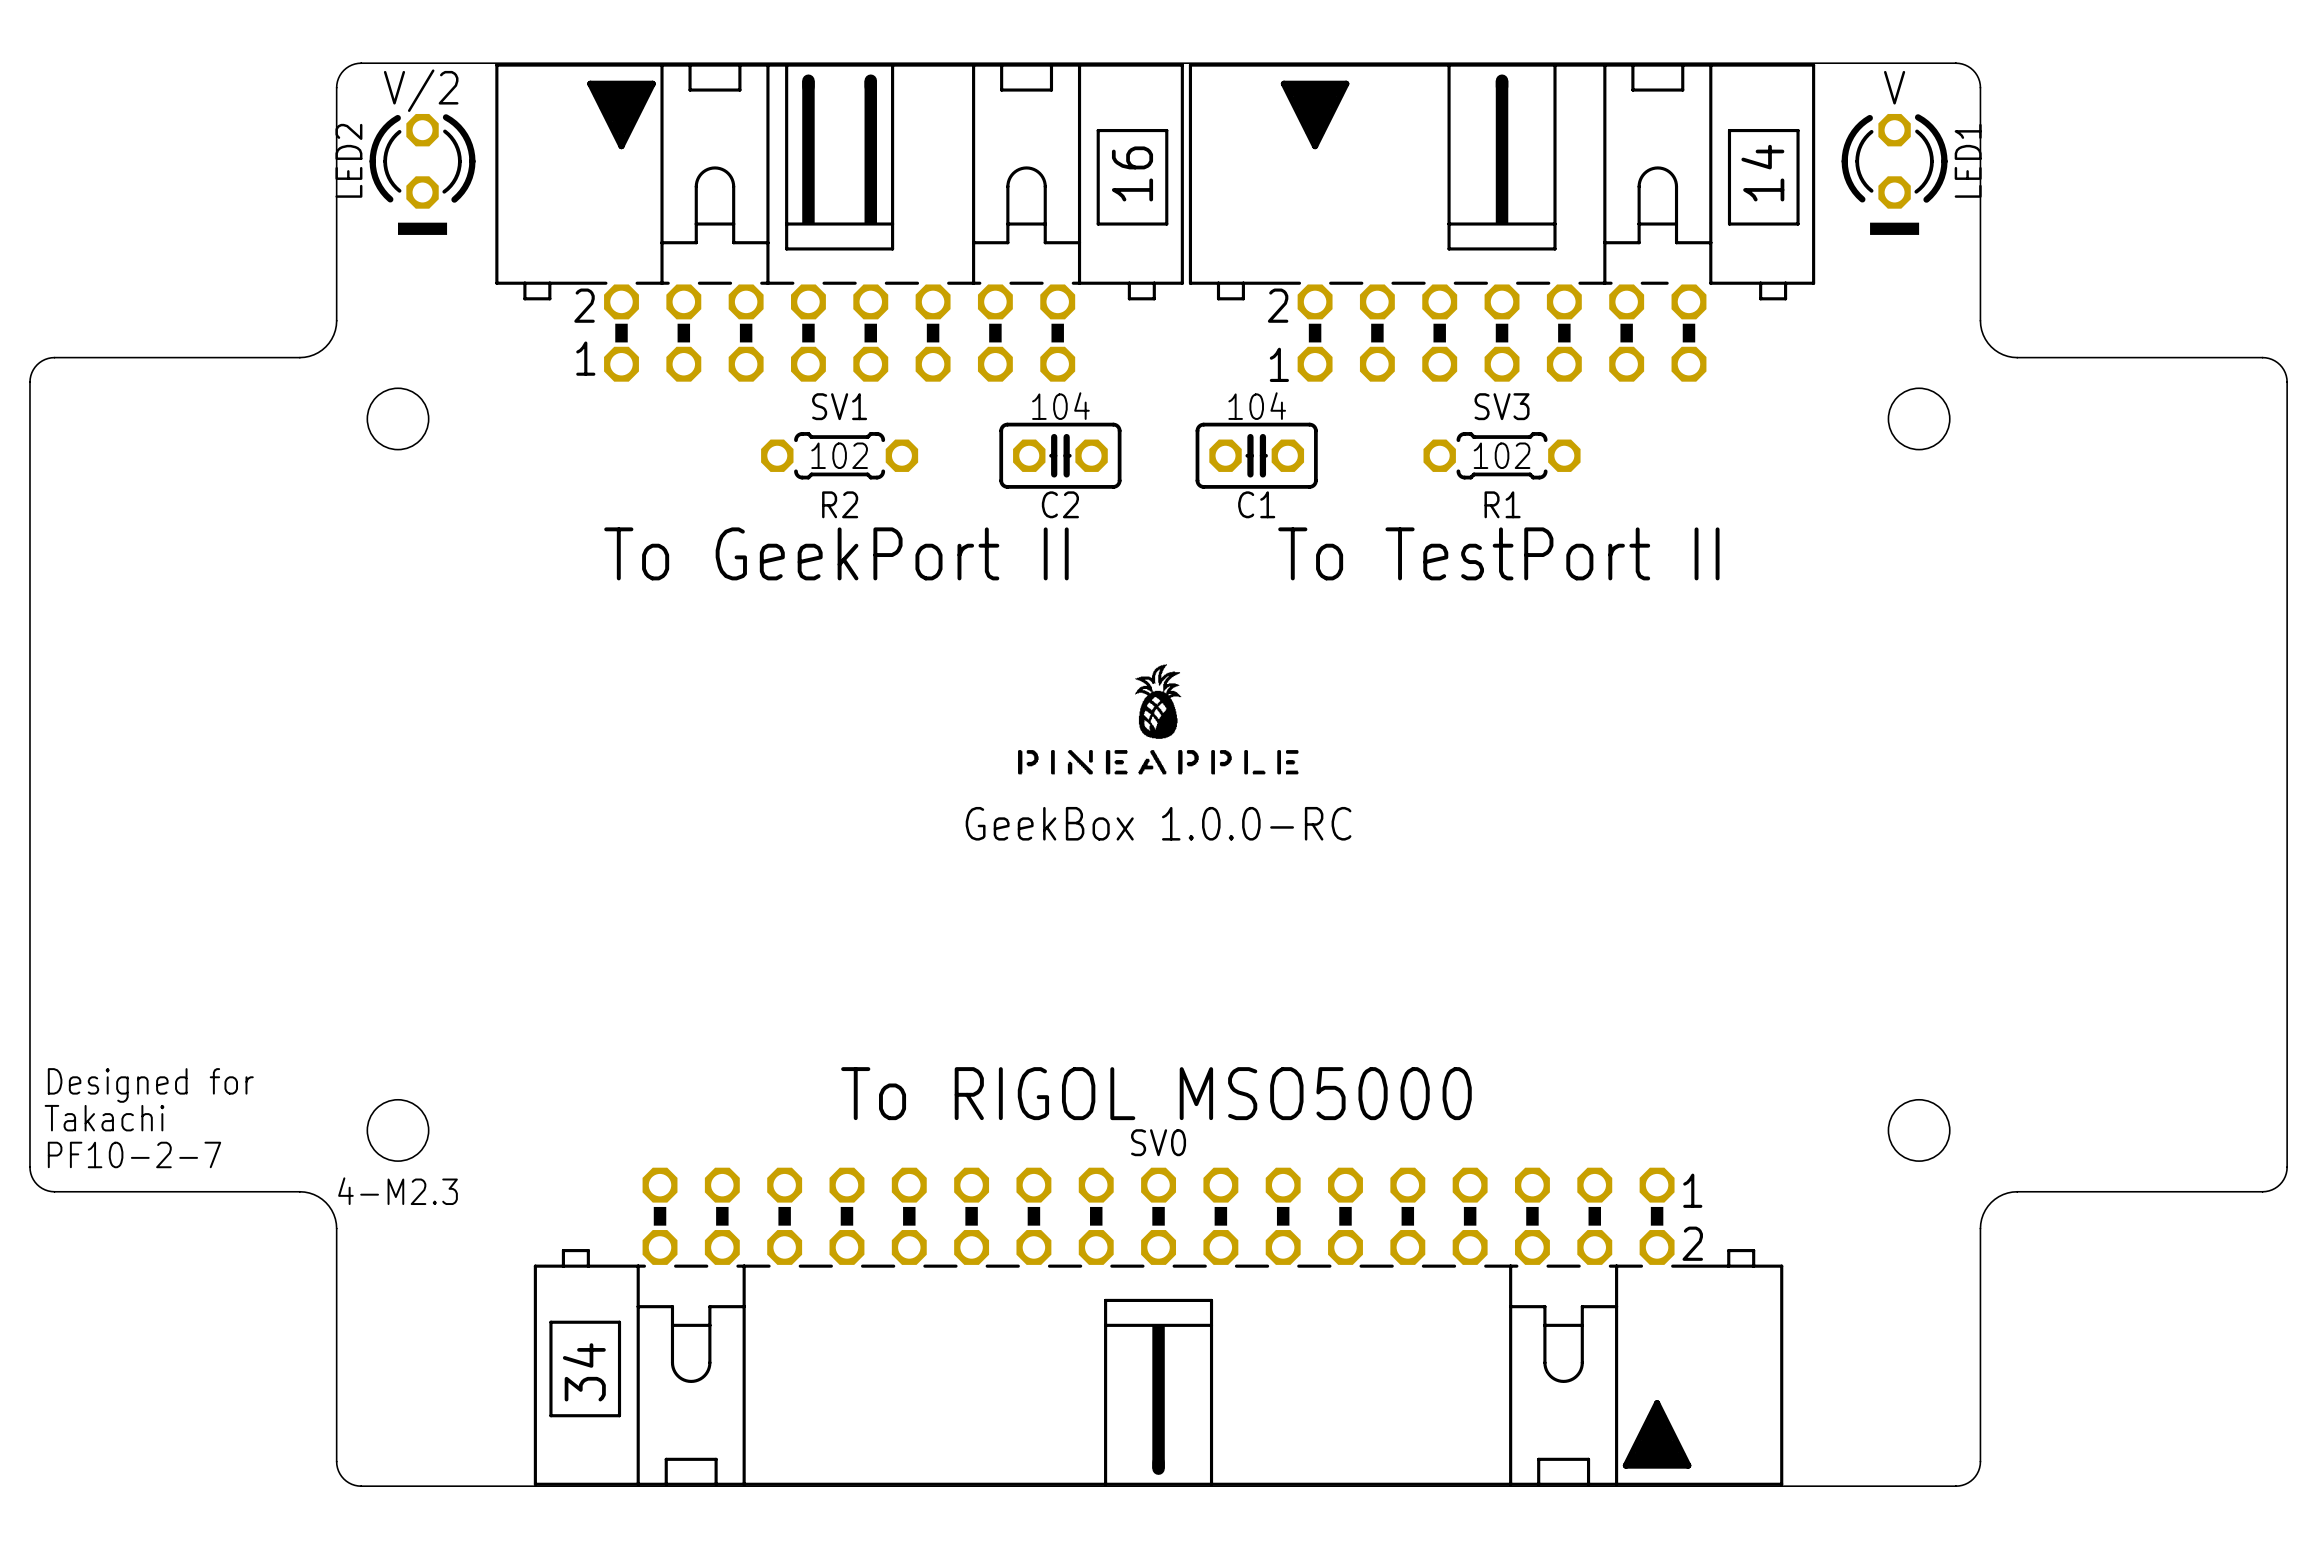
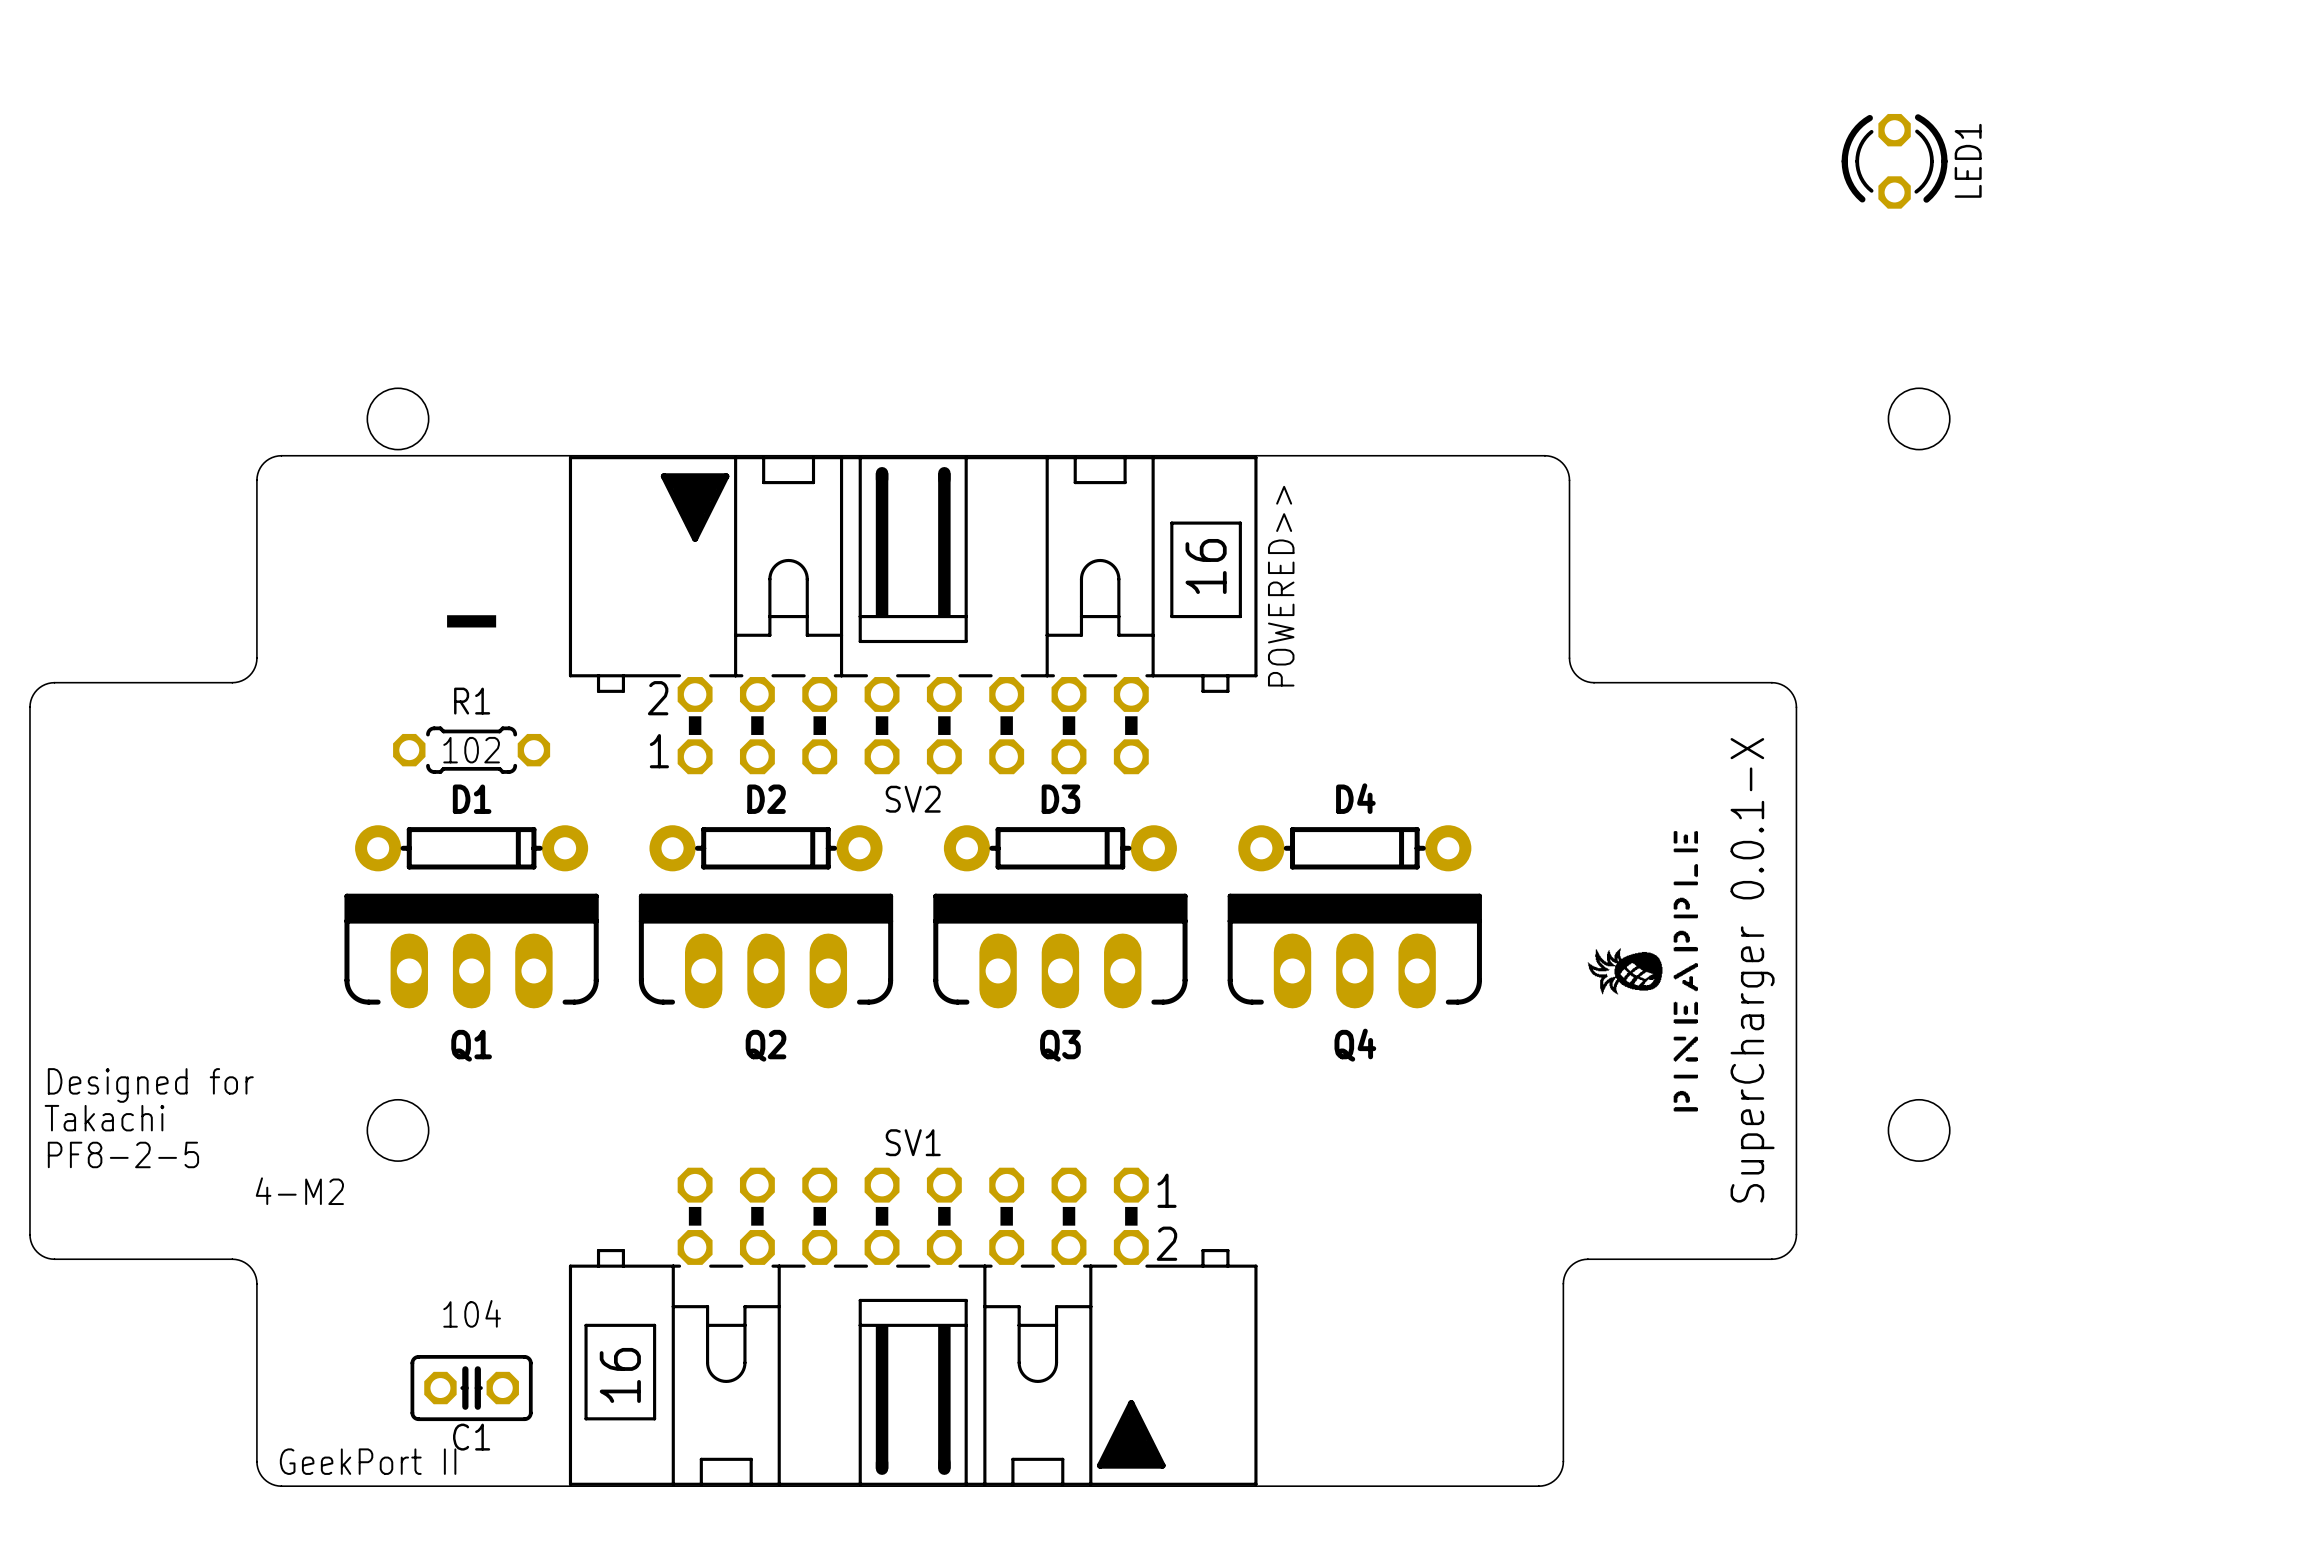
SV1 footprint: [495, 63, 1184, 382] -> [568, 1167, 1258, 1486]
text: V (1894, 87) -> none
text: V/2 (421, 90) -> none
LED2: (422, 161) -> none
SV3: (1502, 222) -> none
drawing: [1870, 222, 1920, 235] -> none
drawing position: (422, 228) -> (471, 621)
SV1 name position: SV1 (839, 406) -> SV1 (913, 1142)
text: 104 (1060, 406) -> none
text: 104 (1257, 406) -> none
text position: 102 (839, 455) -> 102 (471, 750)
R2: (839, 455) -> none
C2: (1060, 455) -> none
C1 position: (1256, 455) -> (471, 1388)
text: 102 (1502, 455) -> none
R1 position: (1502, 455) -> (471, 750)
R1 name position: R1 (1502, 504) -> R1 (472, 701)
text: To GeekPort II (836, 553) -> none
text: To TestPort II (1498, 553) -> none
text: none -> POWERED>> (1281, 586)
SV2: none -> (913, 615)
drawing: [1018, 664, 1299, 775] -> none
board edge: (29, 707) (29, 382) (33, 369) (39, 362) (51, 357) (299, 357) (313, 354) (325, 346) (333, 334) (336, 320) (336, 84) (341, 72) (354, 64) (1955, 63) (1968, 66) (1975, 72) (1980, 84) (1980, 320) (1983, 334) (1991, 346) (2003, 354) (2017, 357) (2265, 357) (2277, 362) (2286, 375) (2286, 1173) (2277, 1186) (2265, 1191) (2017, 1191) (2003, 1194) (1991, 1202) (1983, 1214) (1980, 1228) (1980, 1464) (1975, 1476) (1965, 1484) (1955, 1486) (1538, 1486) -> (29, 707) (35, 692) (42, 685) (51, 682) (232, 682) (241, 680) (249, 675) (255, 667) (256, 658) (257, 477) (264, 462) (278, 455) (1544, 455) (1557, 459) (1564, 465) (1569, 477) (1569, 658) (1571, 667) (1576, 675) (1584, 680) (1594, 682) (1775, 682) (1786, 687) (1795, 700) (1796, 1234) (1791, 1249) (1784, 1255) (1775, 1259) (1587, 1259) (1578, 1261) (1570, 1266) (1565, 1274) (1563, 1283) (1563, 1464) (1560, 1473) (1553, 1481) (1538, 1486)
text: GeekBox 1.0.0-RC (1158, 823) -> none
drawing: none -> [1587, 831, 1698, 1112]
D1: none -> (471, 848)
D2: none -> (766, 848)
D3: none -> (1060, 848)
D4: none -> (1354, 848)
Q1: none -> (471, 951)
Q2: none -> (766, 951)
Q3: none -> (1060, 951)
Q4: none -> (1354, 951)
text: none -> SuperCharger 0.0.1-X (1752, 970)
text: To RIGOL MSO5000 (1156, 1093) -> none
text: PF10-2-7 (134, 1154) -> PF8-2-5 (123, 1154)
board edge: (29, 1167) (35, 1182) (42, 1188) (51, 1191) (299, 1191) (313, 1194) (325, 1202) (333, 1214) (336, 1228) (336, 1464) (339, 1473) (346, 1481) (361, 1486) -> (29, 1167) (30, 1237) (35, 1249) (45, 1257) (54, 1259) (232, 1259) (241, 1261) (249, 1266) (255, 1274) (256, 1283) (256, 1461) (260, 1473) (266, 1481) (278, 1485) (361, 1486)
text: 4-M2.3 (397, 1191) -> 4-M2 (299, 1191)
text: none -> 104 (472, 1313)
SV0: (1158, 1326) -> none
text: none -> GeekPort II (368, 1461)

